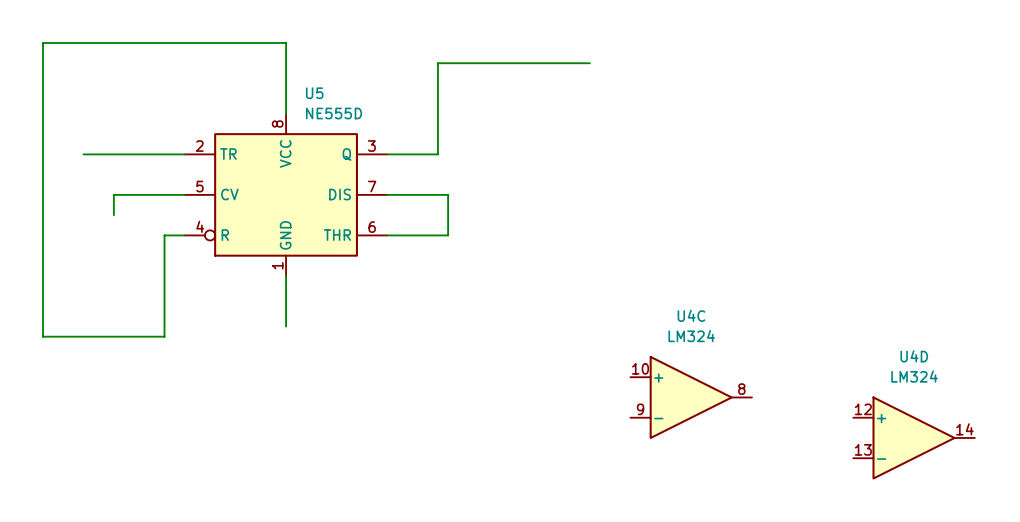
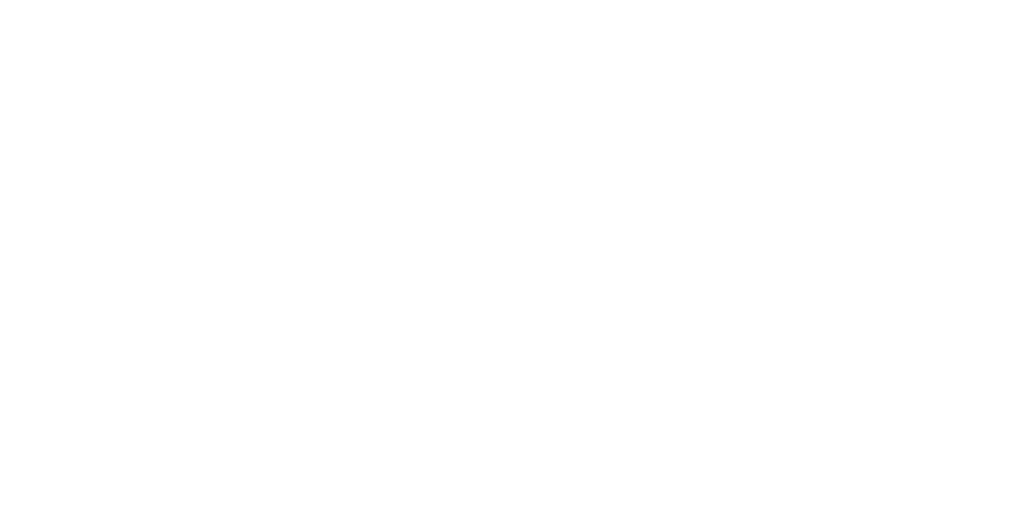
wire: (589, 63) (437, 63) (437, 154) (387, 154) -> none
wire: (286, 113) (286, 42) (42, 42) (42, 336) (164, 336) (164, 235) (184, 235) -> none
wire: (83, 154) (184, 154) -> none
wire: (184, 194) (113, 194) (113, 215) -> none
U5: NE555D (286, 194) -> none
wire: (387, 194) (448, 194) (448, 235) (387, 235) -> none
wire: (286, 275) (286, 326) -> none
U4C: LM324 (691, 397) -> none
U4D: LM324 (914, 437) -> none

